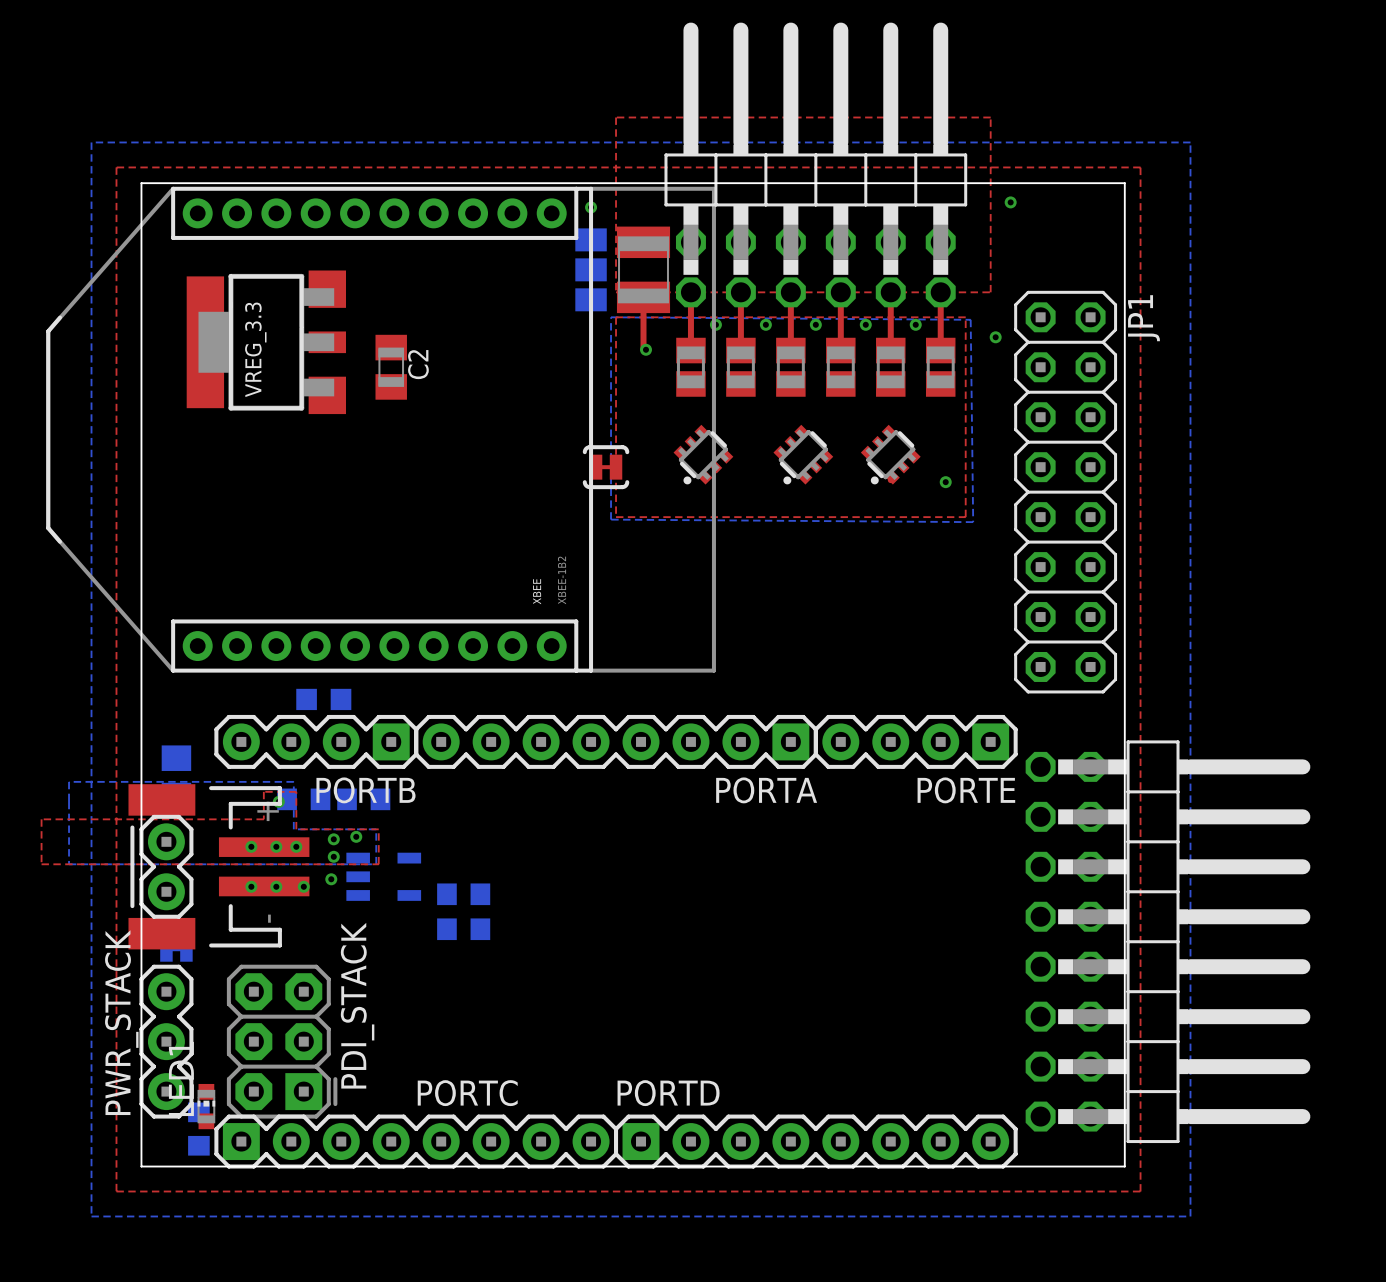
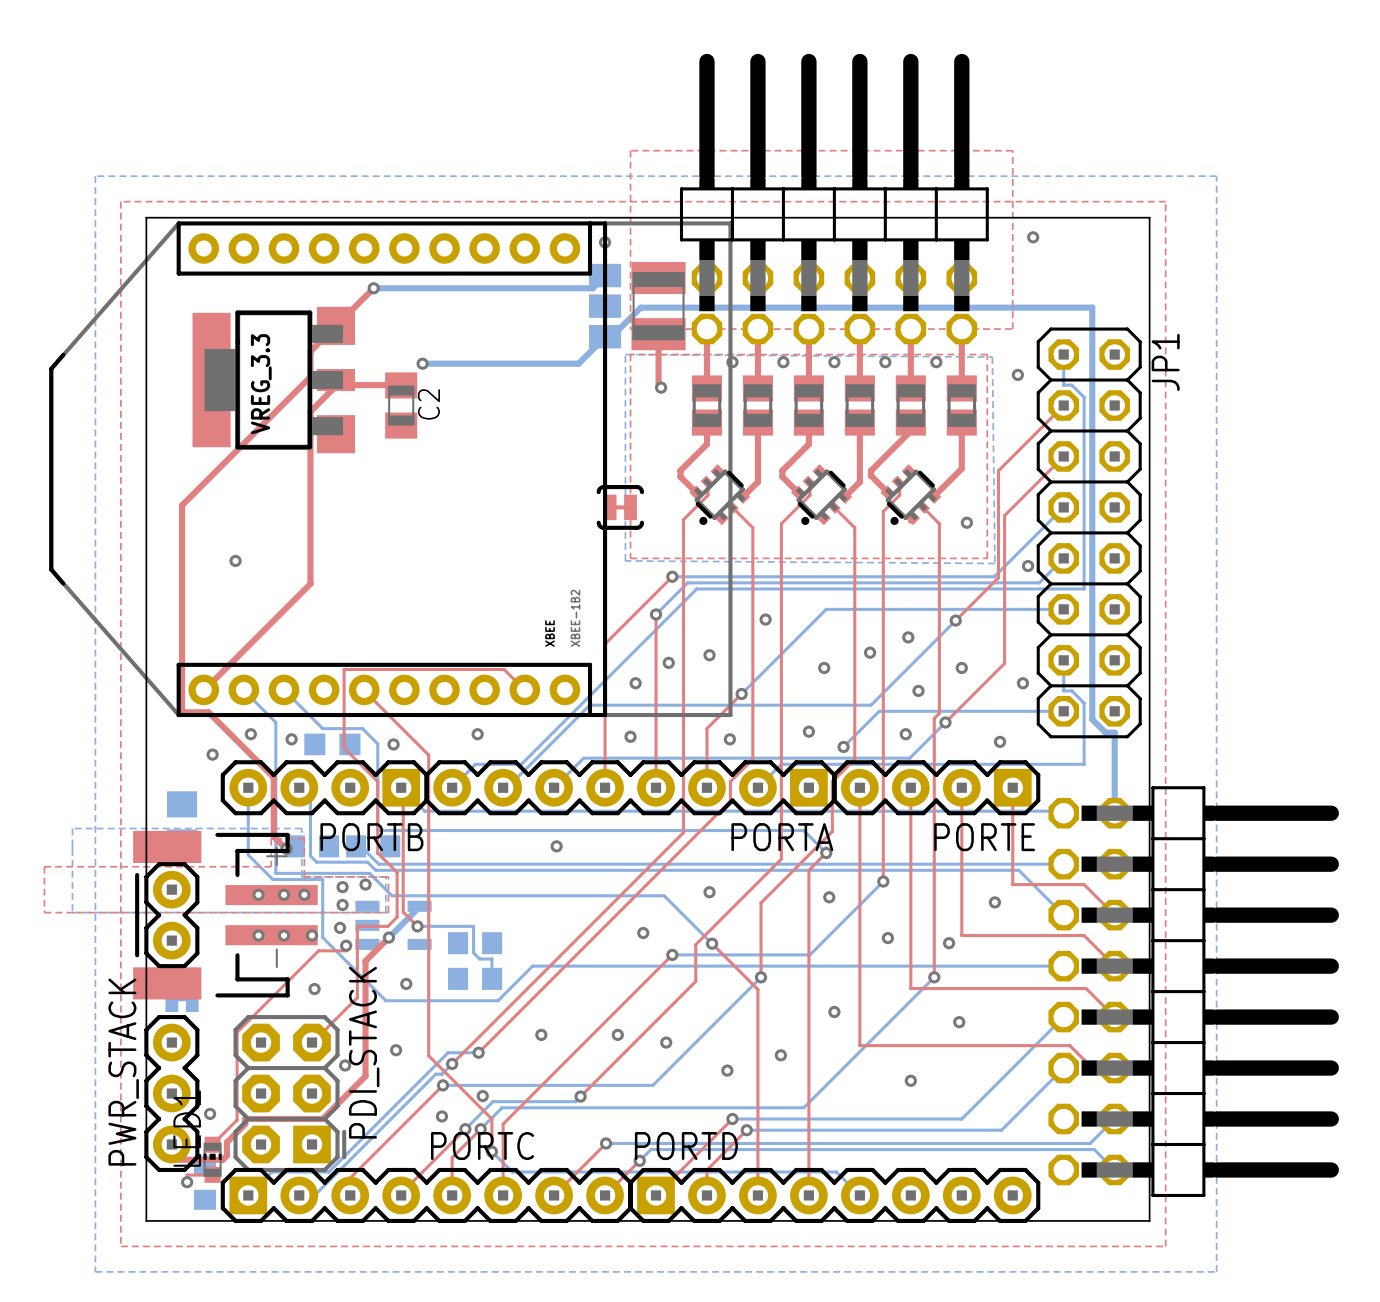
bottom track: none -> (605, 275) (592, 288) (373, 288)
top track: none -> (373, 288) (310, 351) (310, 376) (182, 505) (182, 712) (208, 712) (273, 777) (273, 836) (286, 848)
via: none -> (373, 288)
bottom track: none -> (1063, 354) (1063, 385) (1071, 385) (1084, 397) (1084, 588) (696, 588) (521, 764) (475, 764) (452, 787)
bottom track: none -> (422, 363) (578, 363) (605, 336) (613, 335) (640, 307) (1092, 307) (1092, 719) (1105, 732) (1114, 732) (1114, 813)
via: none -> (422, 363)
top track: none -> (401, 385) (336, 385) (335, 380) (334, 387) (310, 411) (310, 583) (203, 689)
top track: none -> (1063, 405) (998, 470) (998, 577) (955, 620)
top track: none -> (706, 422) (706, 444) (680, 470) (680, 476) (696, 492)
top track: none -> (757, 422) (757, 481) (743, 496)
top track: none -> (808, 422) (808, 444) (782, 470) (782, 476) (798, 492)
top track: none -> (859, 422) (859, 481) (845, 496)
top track: none -> (910, 422) (910, 430) (871, 470) (871, 475) (887, 492)
top track: none -> (961, 422) (961, 468) (934, 496)
top track: none -> (1063, 456) (1004, 515) (1004, 663) (945, 722)
top track: none -> (706, 481) (708, 495) (683, 519) (683, 832) (452, 1063)
top track: none -> (808, 481) (809, 495) (781, 523) (781, 859) (695, 944) (695, 981) (580, 1096)
top track: none -> (898, 481) (899, 495) (883, 511) (883, 881)
top track: none -> (732, 507) (752, 527) (752, 759) (730, 781) (730, 800) (478, 1052)
top track: none -> (834, 507) (854, 527) (854, 759) (832, 781) (832, 831) (761, 902) (761, 977)
top track: none -> (923, 507) (939, 523) (939, 713) (934, 718) (934, 977)
bottom track: none -> (1063, 507) (994, 576) (672, 576)
bottom track: none -> (1063, 558) (1039, 582) (687, 582) (656, 614)
via: none -> (235, 560)
via: none -> (1028, 566)
top track: none -> (672, 576) (605, 644) (605, 787)
via: none -> (672, 576)
bottom track: none -> (1063, 609) (826, 609) (741, 693)
top track: none -> (656, 614) (656, 787)
via: none -> (656, 614)
via: none -> (765, 619)
bottom track: none -> (955, 620) (871, 705) (589, 705) (507, 787) (503, 787)
via: none -> (955, 620)
via: none -> (908, 637)
via: none -> (870, 652)
via: none -> (709, 655)
bottom track: none -> (1063, 660) (1063, 690) (1071, 690) (1084, 703) (1084, 764) (781, 764) (757, 787)
via: none -> (668, 662)
via: none -> (824, 667)
via: none -> (961, 667)
via: none -> (635, 683)
via: none -> (1022, 683)
bottom track: none -> (243, 689) (275, 722) (275, 873) (369, 873) (392, 895) (664, 895) (712, 943)
bottom track: none -> (284, 689) (322, 728) (362, 728) (377, 743) (377, 830) (803, 830) (826, 852)
top track: none -> (364, 689) (428, 755) (428, 1055) (491, 1119) (491, 1151)
top track: none -> (524, 689) (504, 669) (344, 669) (344, 747) (377, 781) (377, 852) (397, 872) (397, 917) (387, 926) (357, 926) (357, 997) (312, 1042)
via: none -> (918, 690)
top track: none -> (741, 693) (706, 728) (706, 787)
via: none -> (741, 693)
bottom track: none -> (1063, 711) (879, 711) (843, 746)
bottom track: none -> (945, 722) (909, 758) (583, 758) (554, 787)
via: none -> (945, 722)
via: none -> (808, 731)
via: none -> (250, 734)
via: none -> (477, 734)
via: none -> (905, 734)
via: none -> (630, 736)
via: none -> (291, 739)
via: none -> (729, 739)
via: none -> (1000, 741)
via: none -> (393, 744)
via: none -> (843, 746)
via: none -> (212, 754)
bottom track: none -> (248, 787) (248, 855) (272, 879) (322, 879) (322, 937) (385, 1000) (498, 1000) (532, 966) (1063, 966)
bottom track: none -> (299, 787) (310, 787) (310, 856) (316, 862) (367, 862) (375, 870) (1018, 870) (1063, 915)
top track: none -> (401, 787) (403, 789) (403, 912) (417, 926)
bottom track: none -> (401, 787) (424, 811) (1061, 811) (1063, 813)
top track: none -> (859, 787) (859, 1045) (1069, 1045) (1084, 1059) (1084, 1068) (1114, 1068)
top track: none -> (910, 787) (910, 988) (1086, 988) (1114, 1017)
top track: none -> (961, 787) (961, 935) (1084, 935) (1114, 966)
top track: none -> (1012, 787) (1012, 884) (1084, 884) (1114, 915)
bottom track: none -> (356, 846) (361, 846) (378, 864) (1063, 864)
via: none -> (556, 846)
top track: none -> (826, 852) (808, 870) (808, 1195)
via: none -> (826, 852)
bottom track: none -> (883, 881) (809, 954) (672, 954)
via: none -> (883, 881)
via: none -> (709, 892)
via: none -> (829, 897)
via: none -> (994, 902)
bottom track: none -> (419, 906) (388, 937)
bottom track: none -> (417, 926) (473, 926) (473, 952) (479, 958) (491, 958) (492, 978)
via: none -> (417, 926)
via: none -> (643, 932)
top track: none -> (388, 937) (365, 961) (365, 1076) (322, 1119) (245, 1119) (245, 1124) (226, 1142) (226, 1155) (222, 1159) (171, 1159) (171, 1144)
via: none -> (388, 937)
via: none -> (887, 938)
top track: none -> (712, 943) (757, 989) (757, 1195)
via: none -> (712, 943)
via: none -> (949, 943)
top track: none -> (346, 945) (346, 950) (318, 950) (237, 1032) (237, 1120) (212, 1144)
via: none -> (346, 945)
top track: none -> (672, 954) (503, 1124) (503, 1195)
via: none -> (672, 954)
bottom track: none -> (761, 977) (652, 1085) (442, 1085)
via: none -> (761, 977)
bottom track: none -> (934, 977) (803, 1107) (502, 1107) (480, 1129)
via: none -> (934, 977)
via: none -> (406, 983)
via: none -> (314, 989)
via: none -> (834, 1011)
bottom track: none -> (1063, 1017) (961, 1119) (732, 1119)
via: none -> (959, 1022)
via: none -> (541, 1034)
via: none -> (617, 1034)
via: none -> (666, 1042)
via: none -> (396, 1050)
bottom track: none -> (478, 1052) (448, 1052) (328, 1172) (271, 1172) (248, 1195)
via: none -> (478, 1052)
via: none -> (780, 1055)
bottom track: none -> (452, 1063) (441, 1074) (435, 1074) (314, 1195) (299, 1195)
via: none -> (452, 1063)
via: none -> (345, 1065)
bottom track: none -> (1063, 1068) (1001, 1130) (746, 1130)
via: none -> (727, 1070)
via: none -> (910, 1080)
top track: none -> (442, 1085) (350, 1178) (350, 1195)
via: none -> (442, 1085)
via: none -> (482, 1096)
bottom track: none -> (580, 1096) (575, 1101) (492, 1101) (465, 1129)
via: none -> (580, 1096)
via: none -> (210, 1113)
via: none -> (441, 1116)
top track: none -> (732, 1119) (656, 1195)
via: none -> (732, 1119)
bottom track: none -> (1114, 1119) (1090, 1143) (606, 1143)
top track: none -> (465, 1129) (401, 1195)
via: none -> (465, 1129)
top track: none -> (480, 1129) (452, 1157) (452, 1195)
via: none -> (480, 1129)
top track: none -> (746, 1130) (706, 1169) (706, 1195)
via: none -> (746, 1130)
top track: none -> (606, 1143) (554, 1195)
via: none -> (606, 1143)
bottom track: none -> (491, 1151) (512, 1172) (836, 1172) (859, 1195)
via: none -> (491, 1151)
top track: none -> (639, 1160) (605, 1195)
bottom track: none -> (639, 1160) (650, 1149) (1094, 1149) (1114, 1169)
via: none -> (639, 1160)
top track: none -> (212, 1175) (187, 1175) (187, 1182)
via: none -> (187, 1182)

